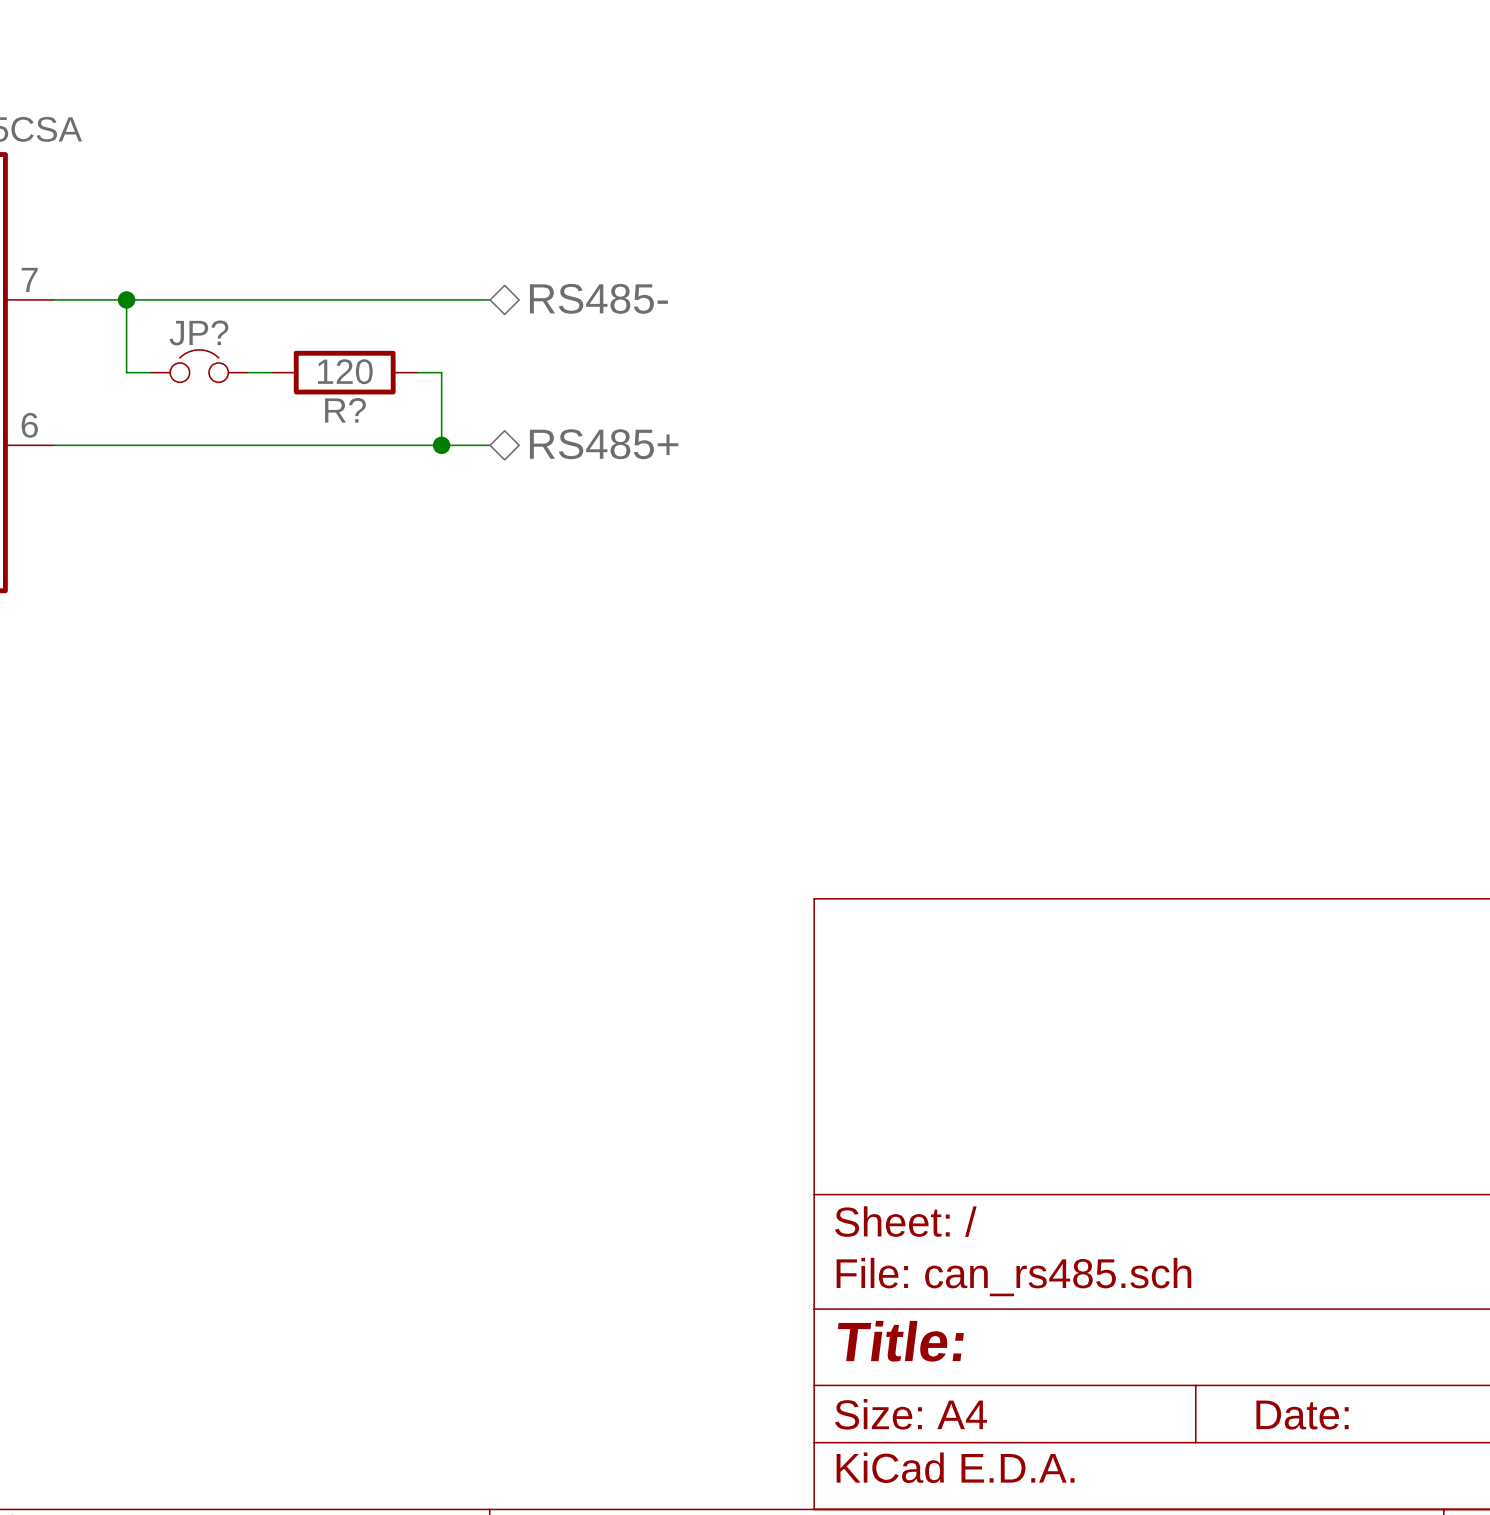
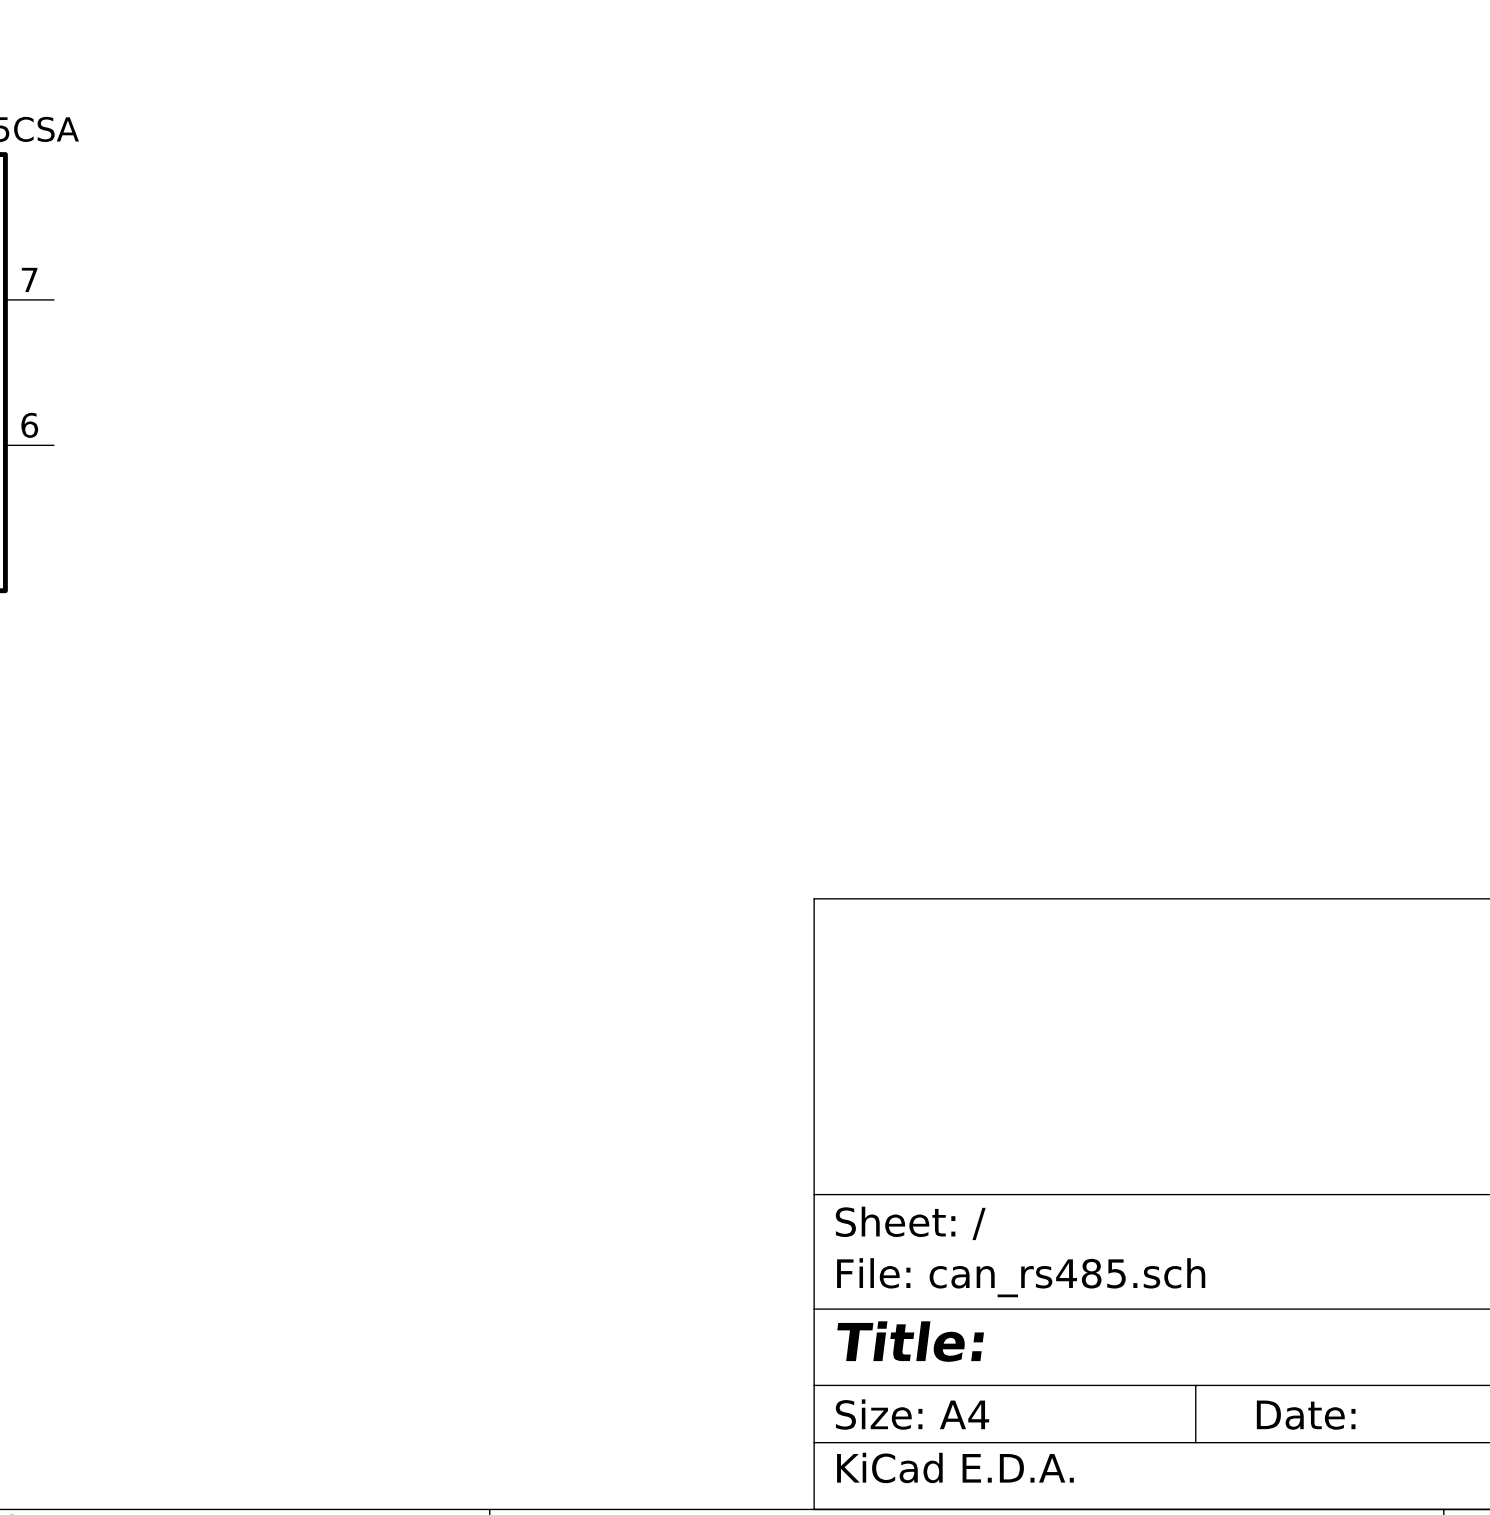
hierarchical label: RS485- (598, 298) -> none
wire: (53, 299) (490, 299) -> none
wire: (126, 299) (126, 372) (150, 372) -> none
junction: (126, 299) -> none
JP?: (199, 366) -> none
wire: (247, 372) (272, 372) -> none
R?: 120 (344, 372) -> none
wire: (417, 372) (441, 372) (441, 445) -> none
hierarchical label: RS485+ (604, 444) -> none
wire: (53, 445) (490, 445) -> none
junction: (441, 445) -> none

